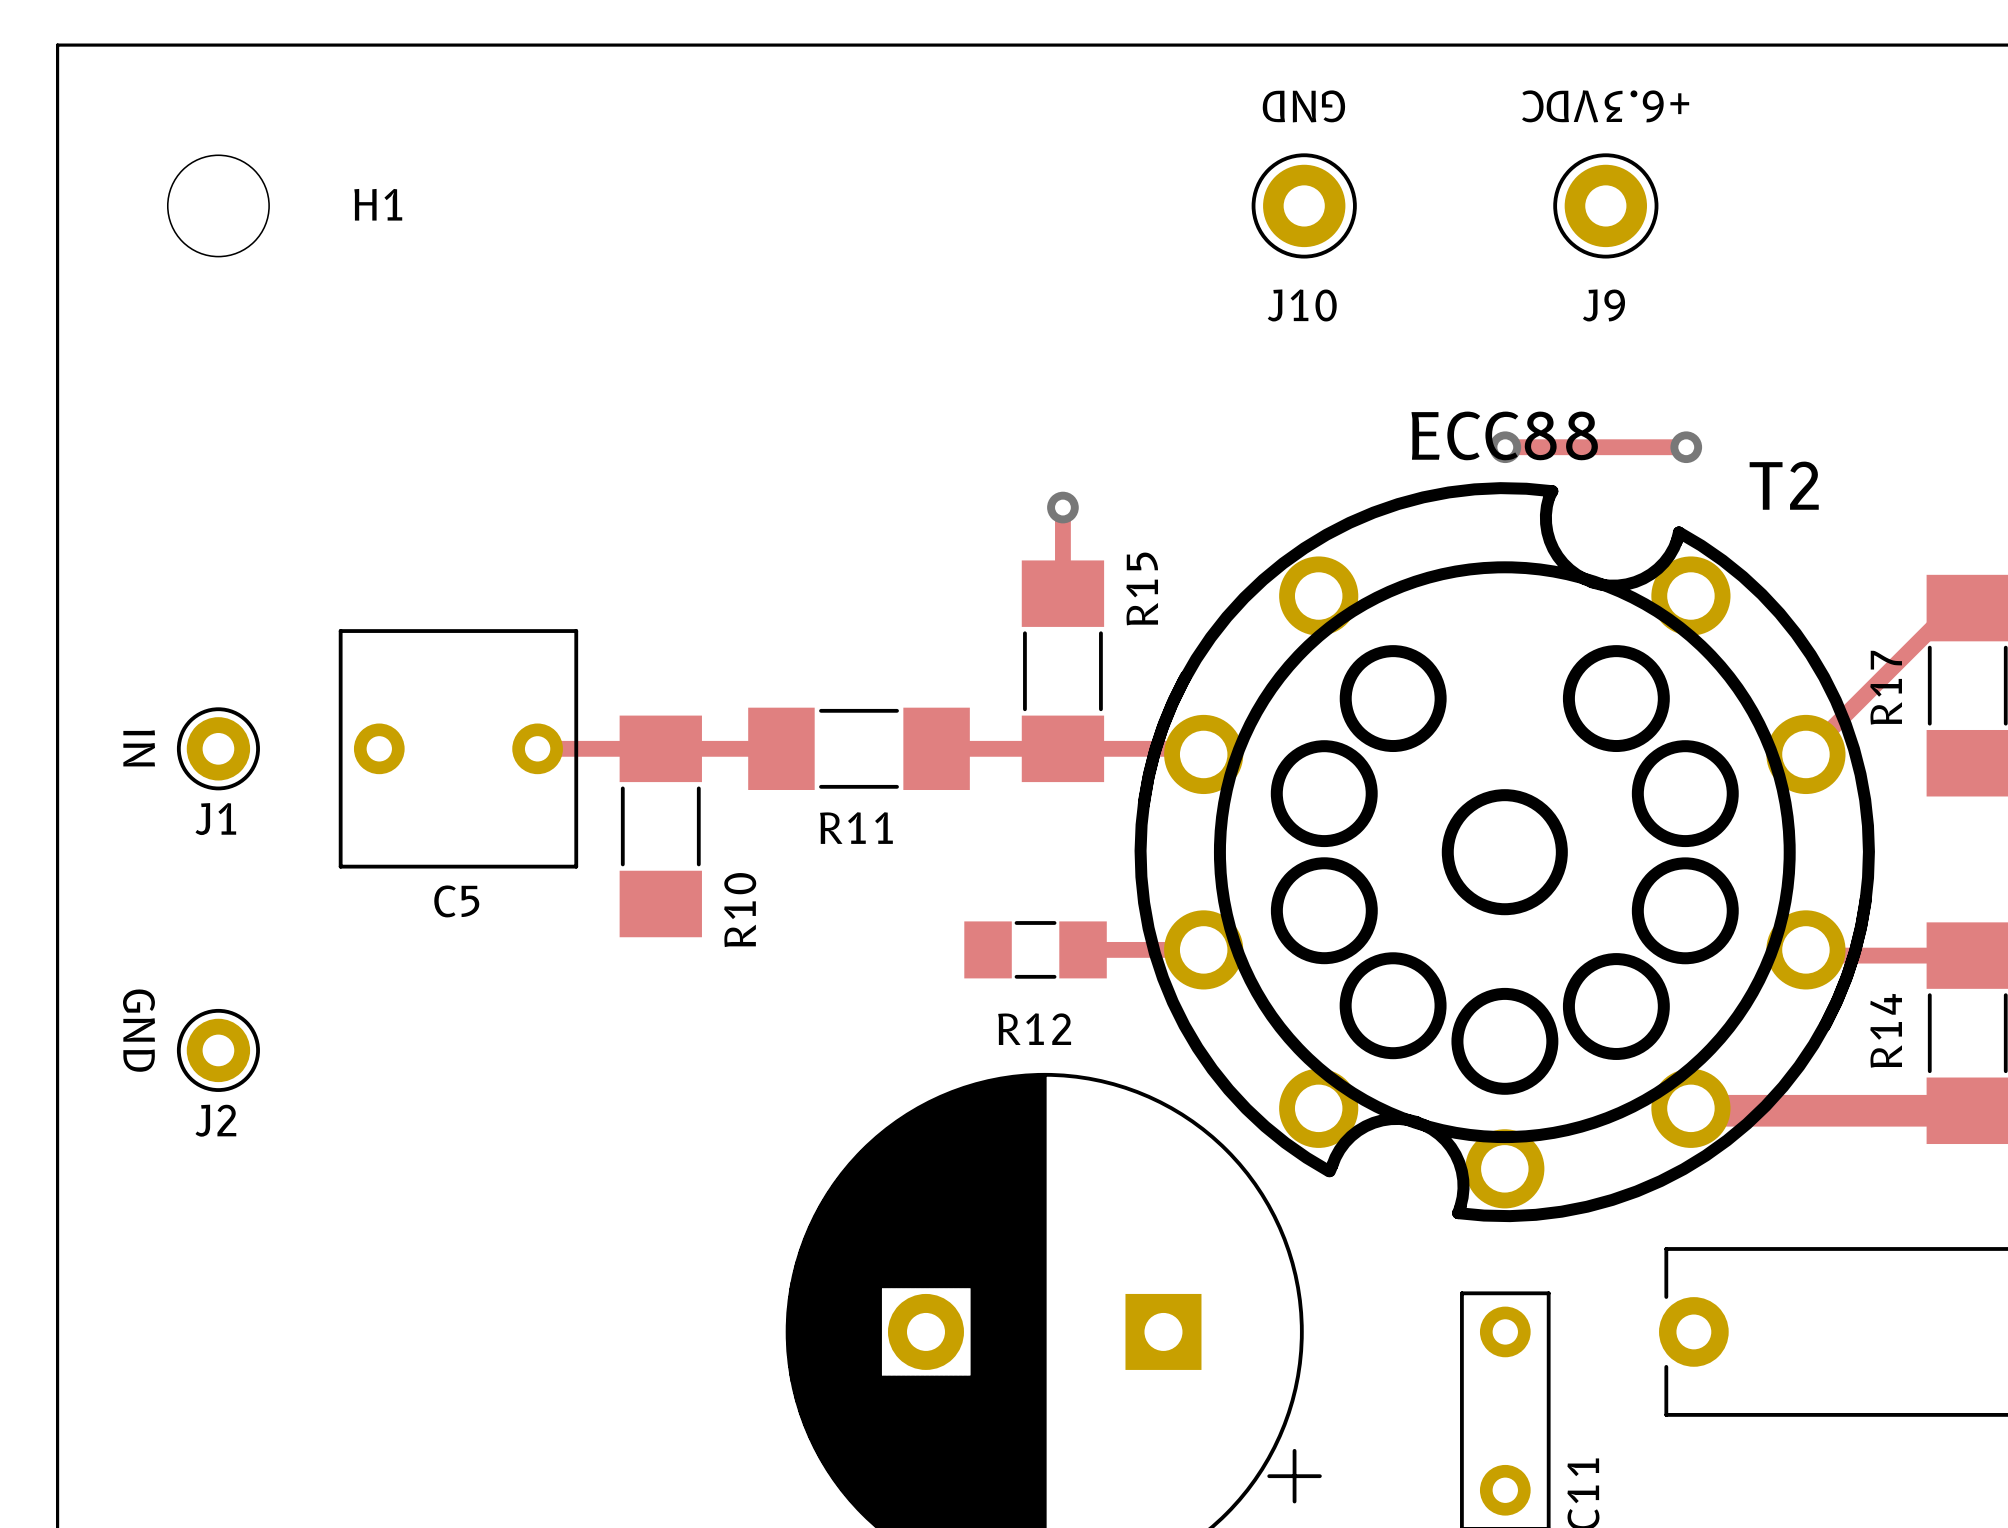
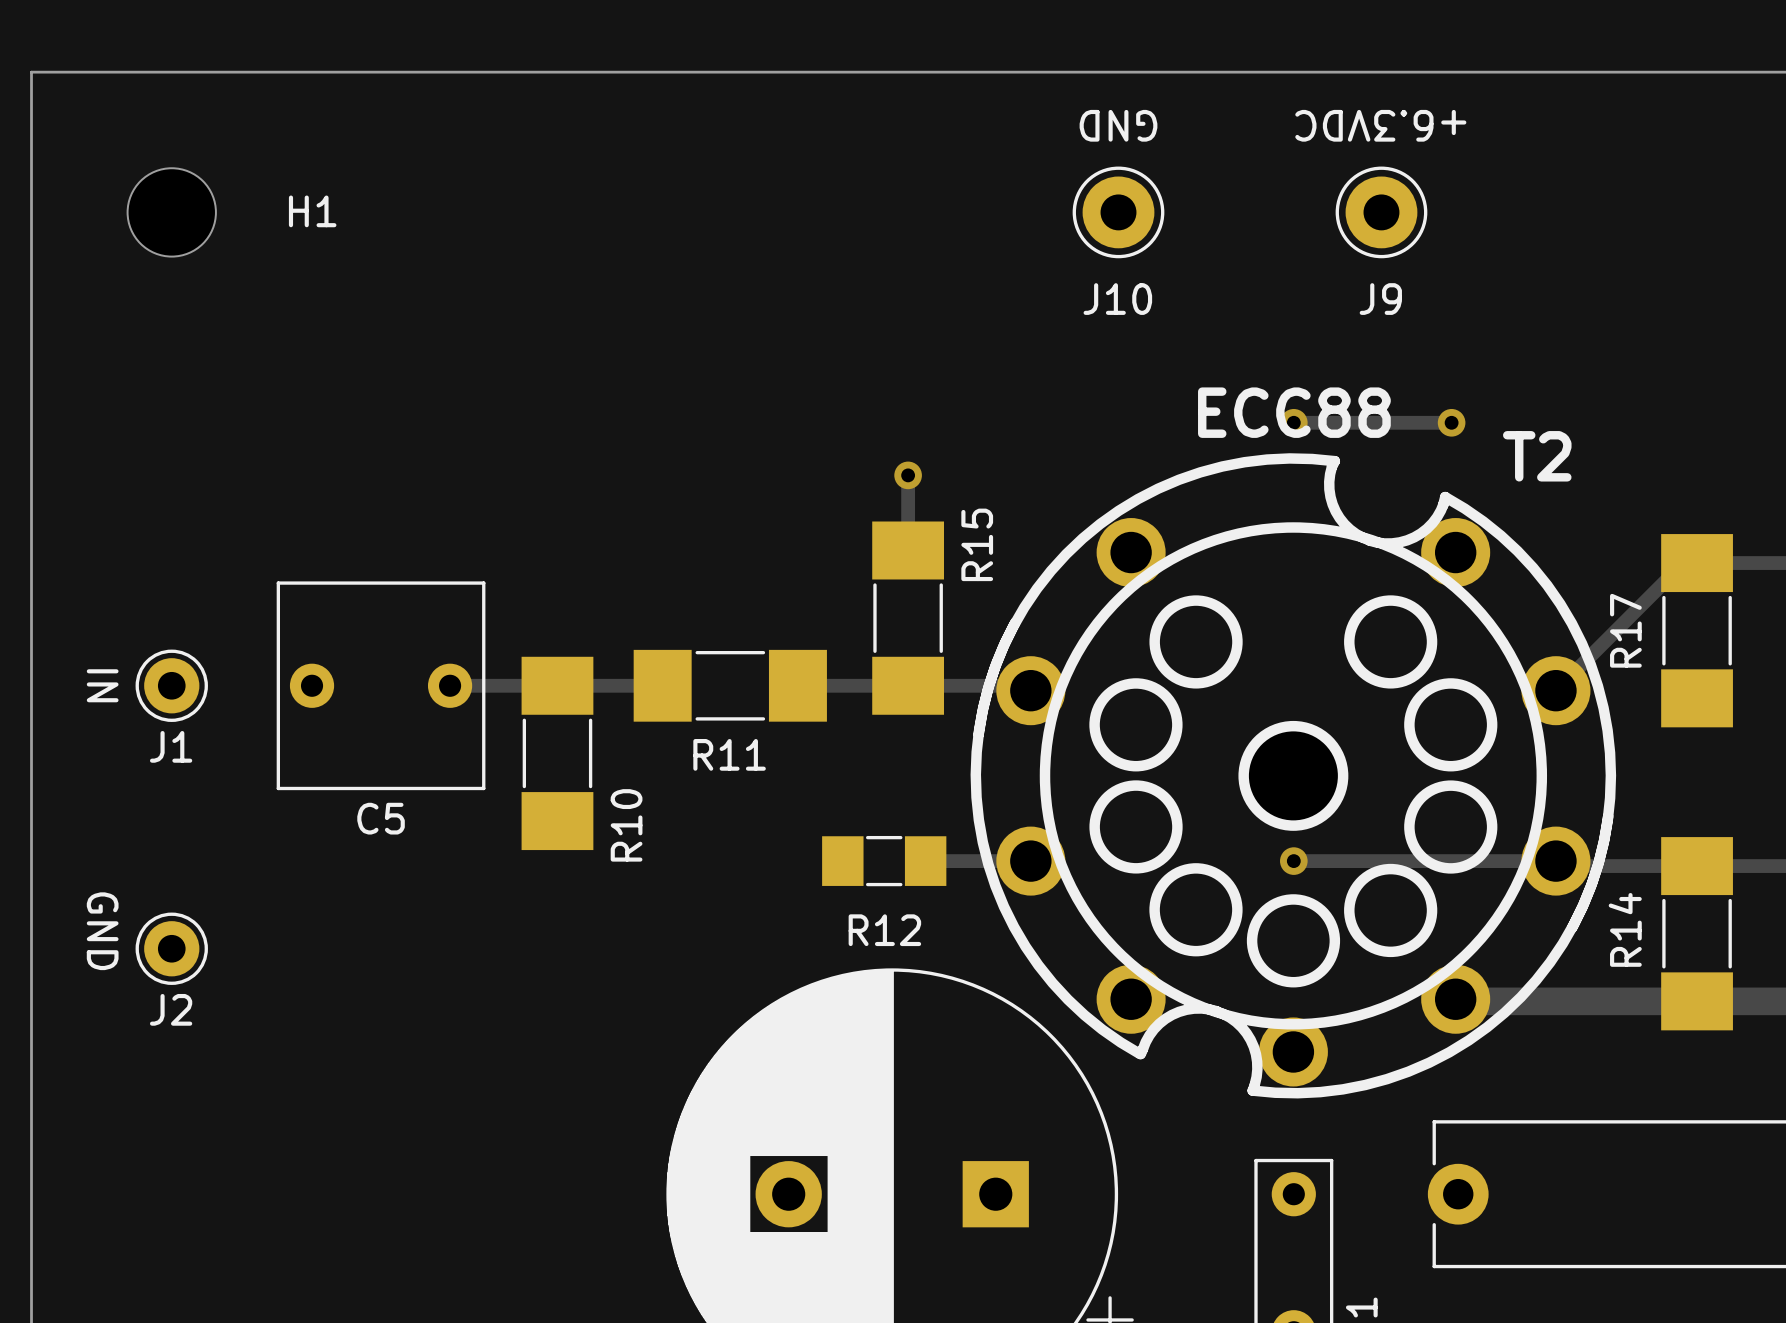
track: none -> (1293, 861) (1555, 861)
via: none -> (1293, 861)

